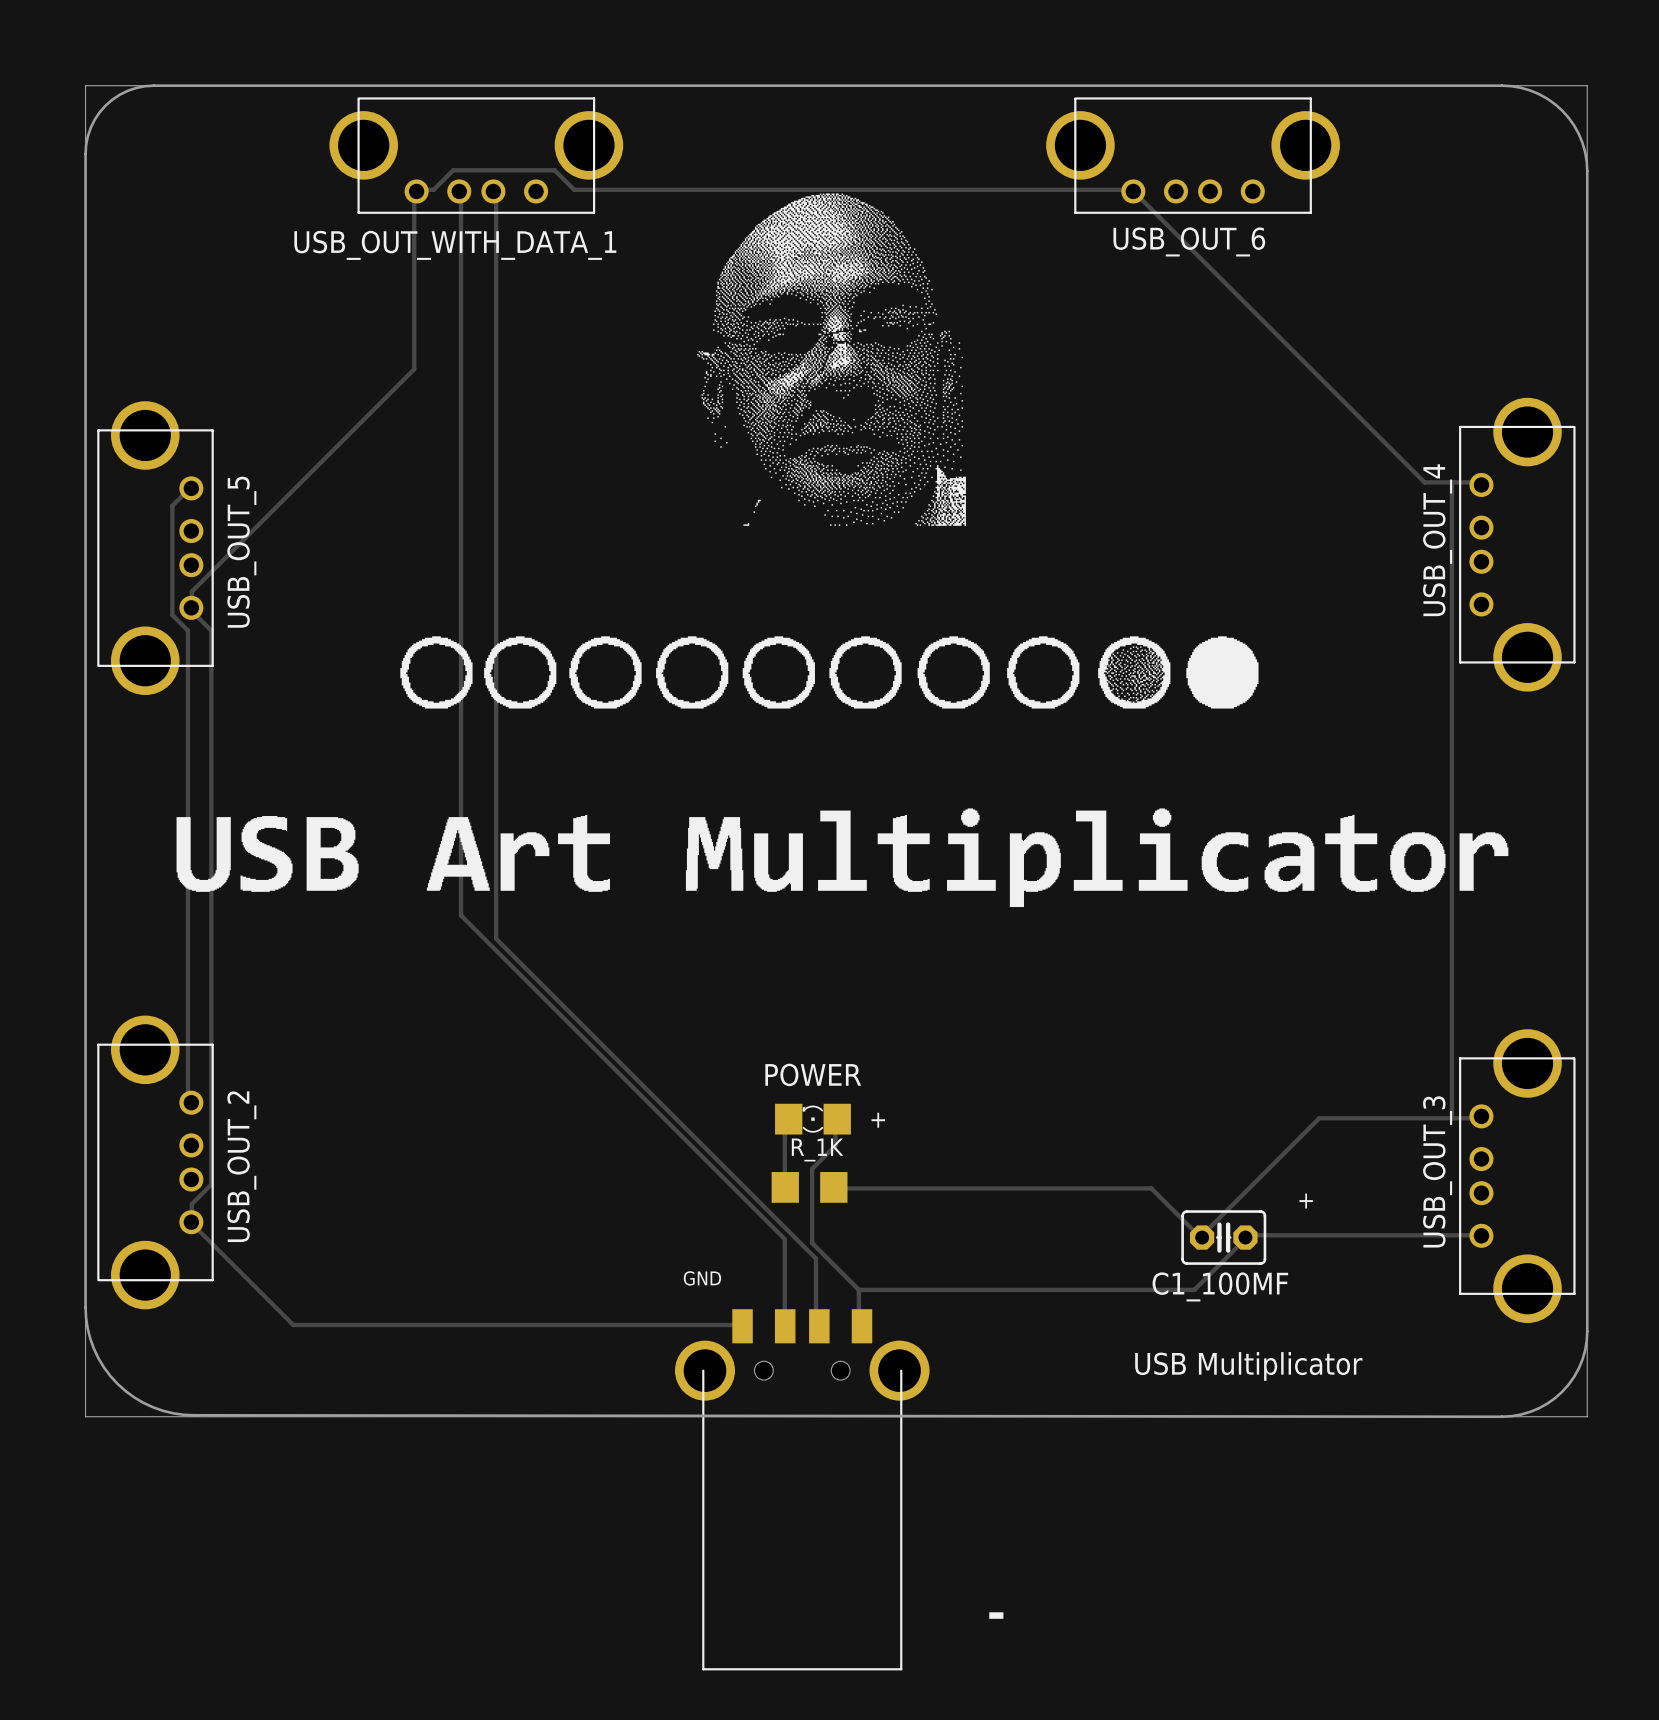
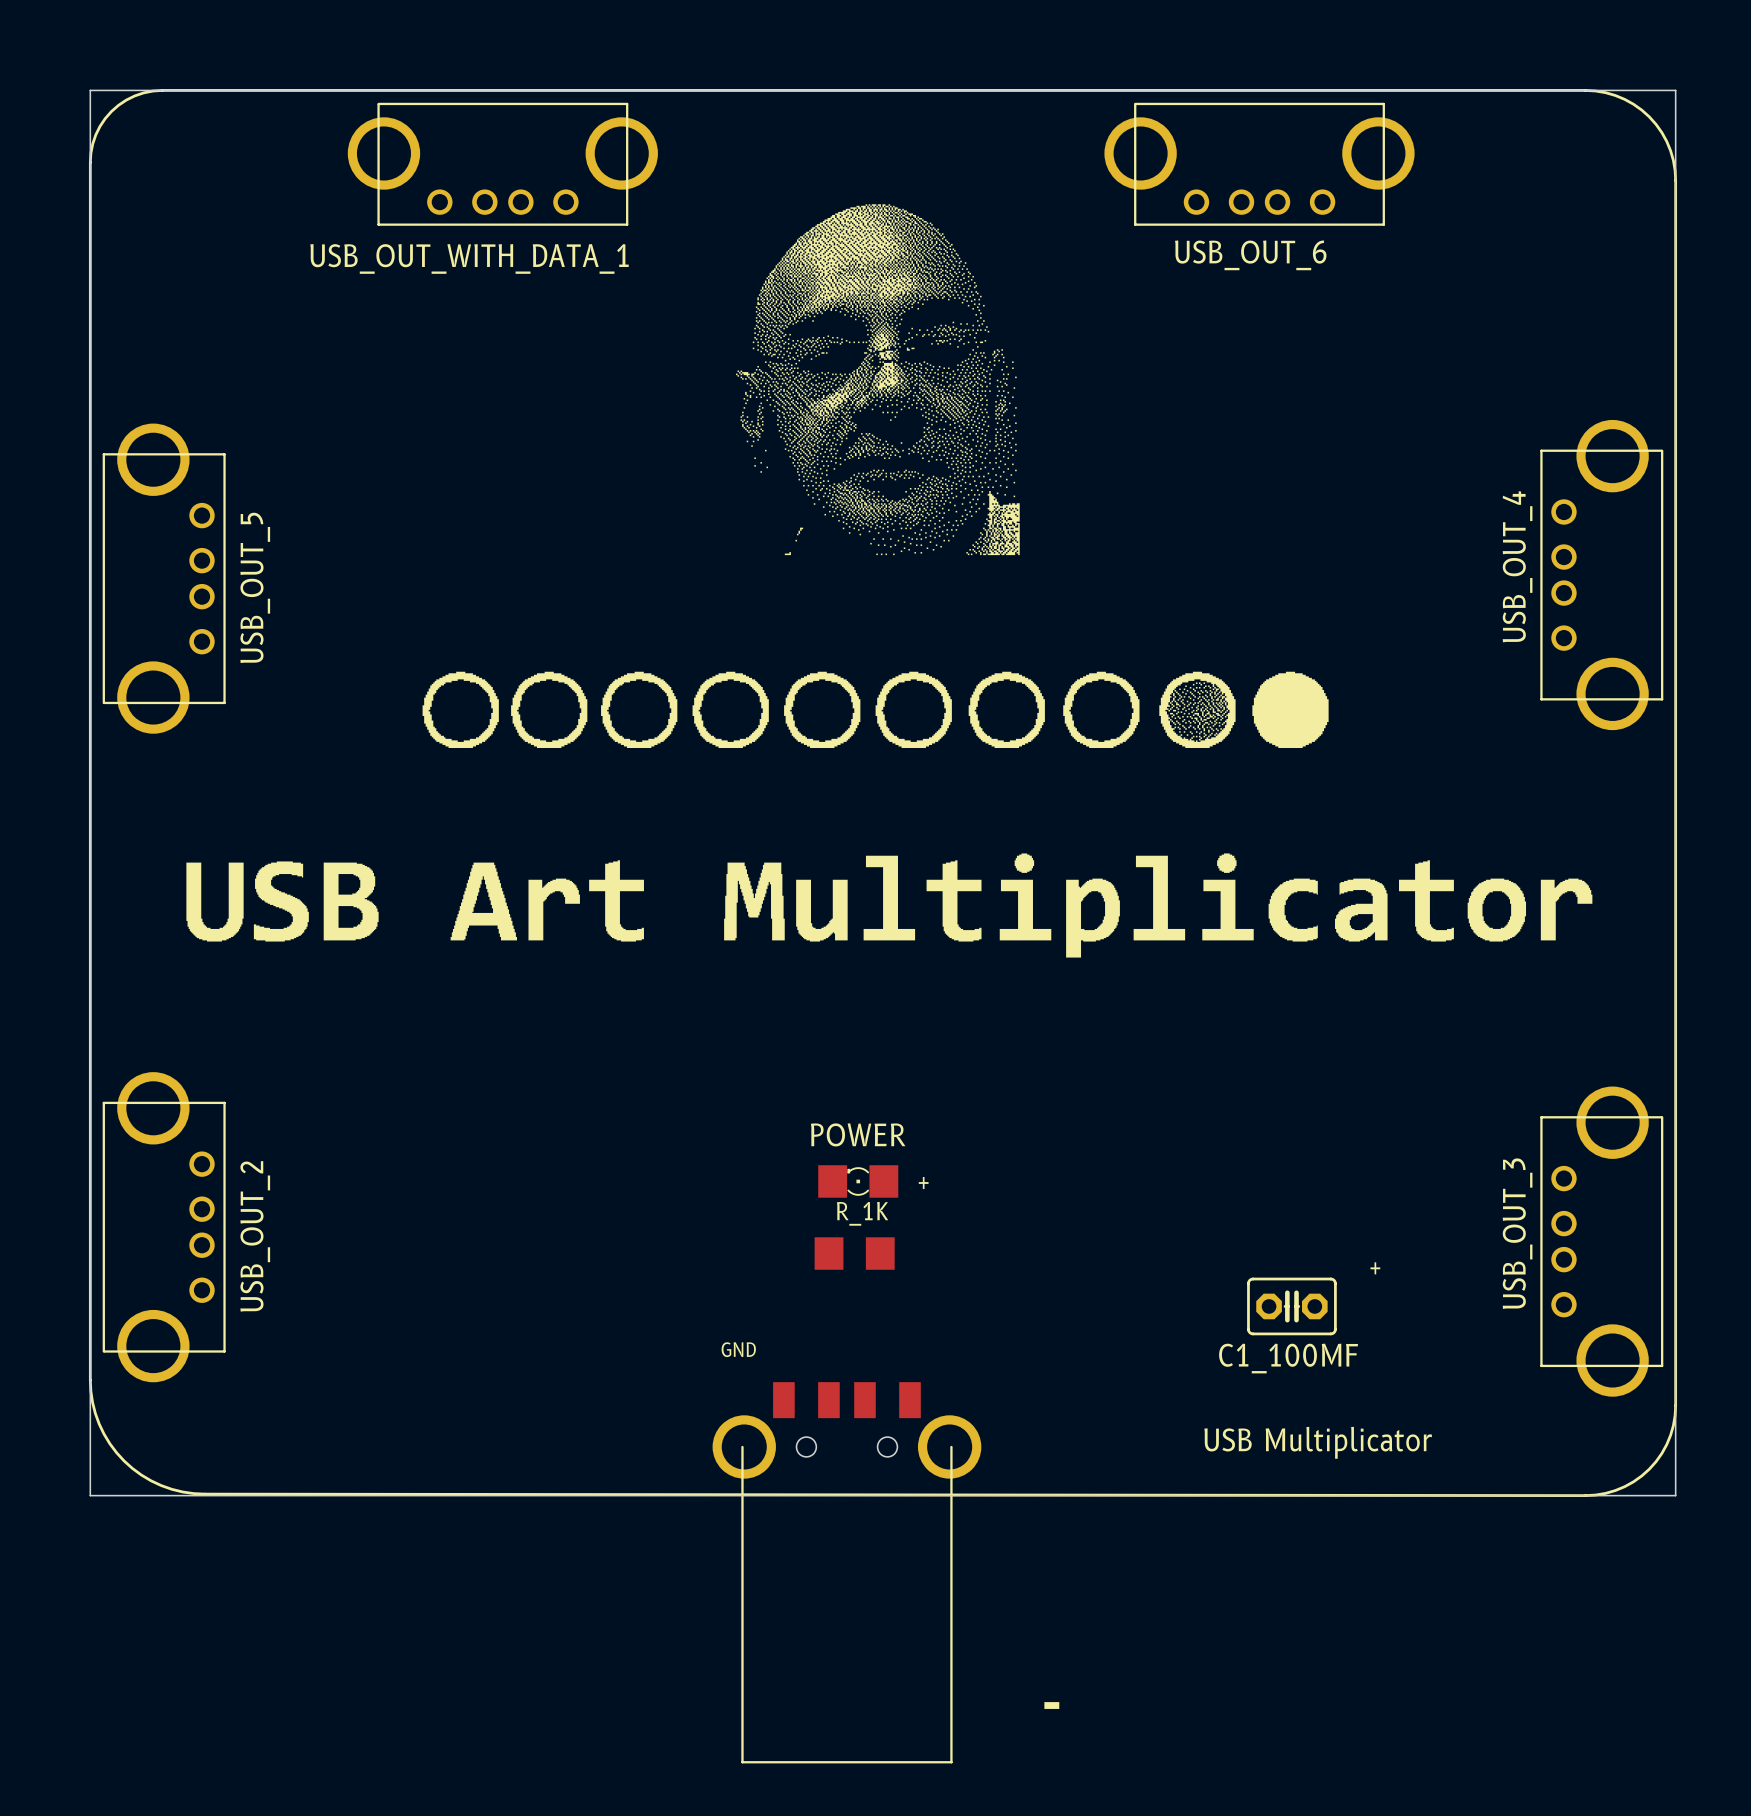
board edge: (153, 85) (1501, 85) (1530, 90) (1547, 98) (1562, 110) (1574, 125) (1582, 142) (1587, 170) (1587, 1331) (1582, 1359) (1574, 1376) (1562, 1391) (1547, 1403) (1530, 1411) (1501, 1416) (194, 1415) (173, 1413) (152, 1407) (134, 1397) (117, 1383) (104, 1367) (93, 1348) (87, 1328) (85, 1307) (85, 153) (90, 127) (105, 105) (127, 90) (153, 85) -> none
line: none -> (162, 90) (1585, 90) (1615, 95) (1633, 104) (1649, 116) (1661, 132) (1670, 150) (1675, 180) (1675, 1405) (1670, 1435) (1661, 1453) (1649, 1469) (1633, 1481) (1615, 1490) (1585, 1495) (205, 1494) (182, 1491) (161, 1485) (141, 1475) (124, 1460) (109, 1443) (99, 1423) (92, 1402) (90, 1380) (90, 162) (95, 134) (111, 111) (134, 95) (162, 90)
track: (459, 191) (461, 193) (461, 915) (784, 1239) (785, 1326) -> none
track: (493, 191) (496, 193) (496, 938) (816, 1258) (816, 1325) (819, 1326) -> none
track: (1451, 482) (1451, 1118) -> none
track: (1481, 484) (1479, 482) (1424, 482) (1132, 189) (574, 189) (554, 170) (453, 170) (433, 189) (418, 189) (414, 193) (414, 369) (191, 591) (191, 611) (211, 630) (211, 1184) (191, 1204) (191, 1222) (293, 1325) (742, 1326) -> none
track: (191, 488) (172, 505) (172, 615) (187, 630) (187, 1102) (191, 1102) -> none
track: (1481, 1116) (1479, 1118) (1319, 1118) (1202, 1237) (1151, 1188) (833, 1187) -> none
track: (788, 1119) (784, 1122) (785, 1187) -> none
track: (837, 1119) (835, 1122) (835, 1145) (812, 1168) (812, 1243) (858, 1289) -> none
track: (1481, 1235) (1249, 1235) (1194, 1289) (858, 1289) -> none
track: (858, 1289) (858, 1325) (862, 1326) -> none

